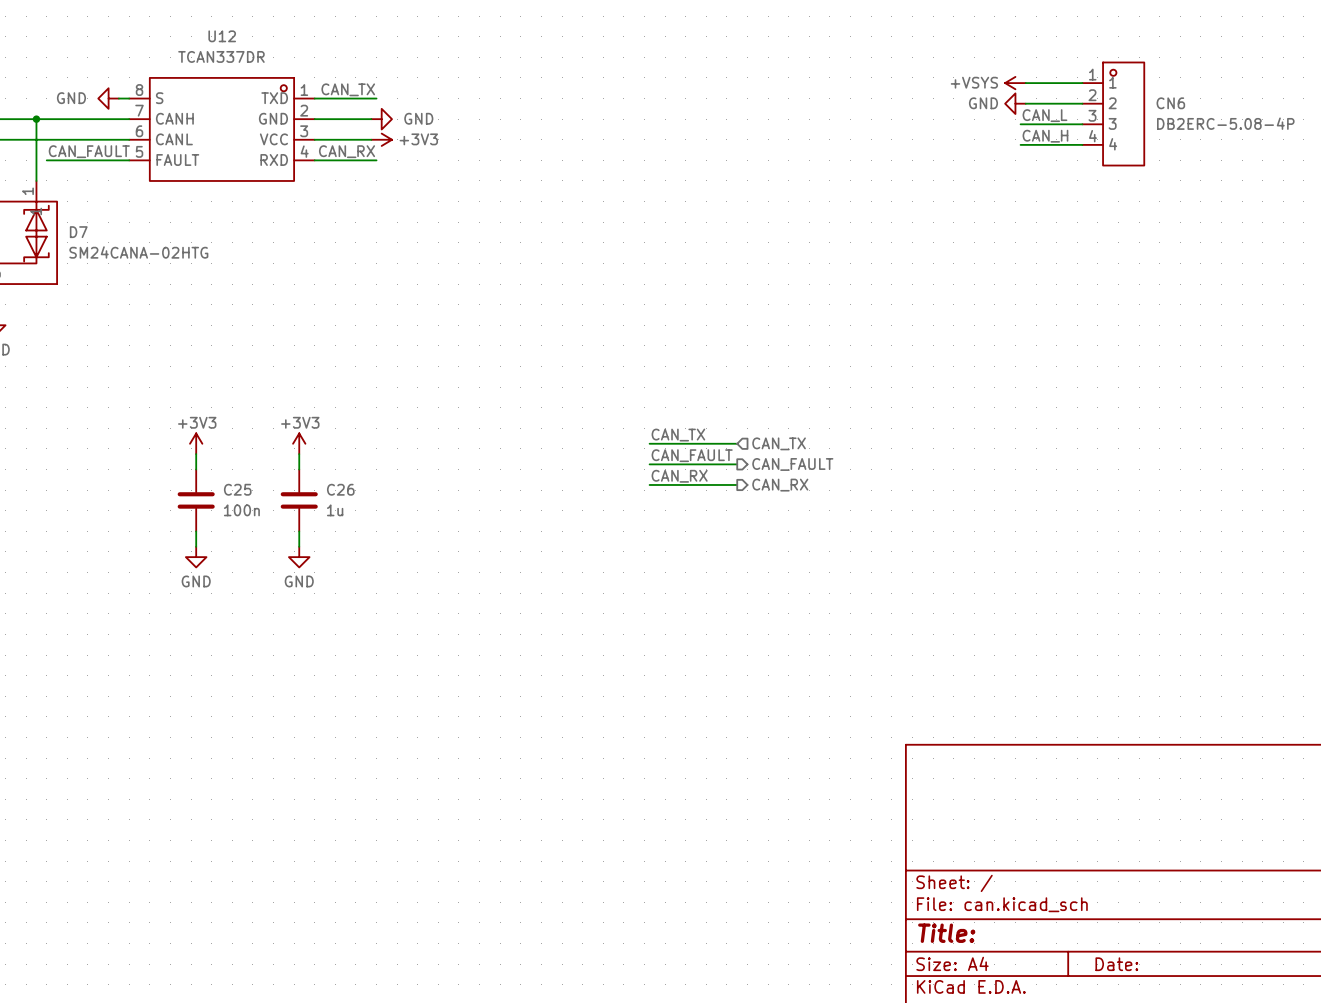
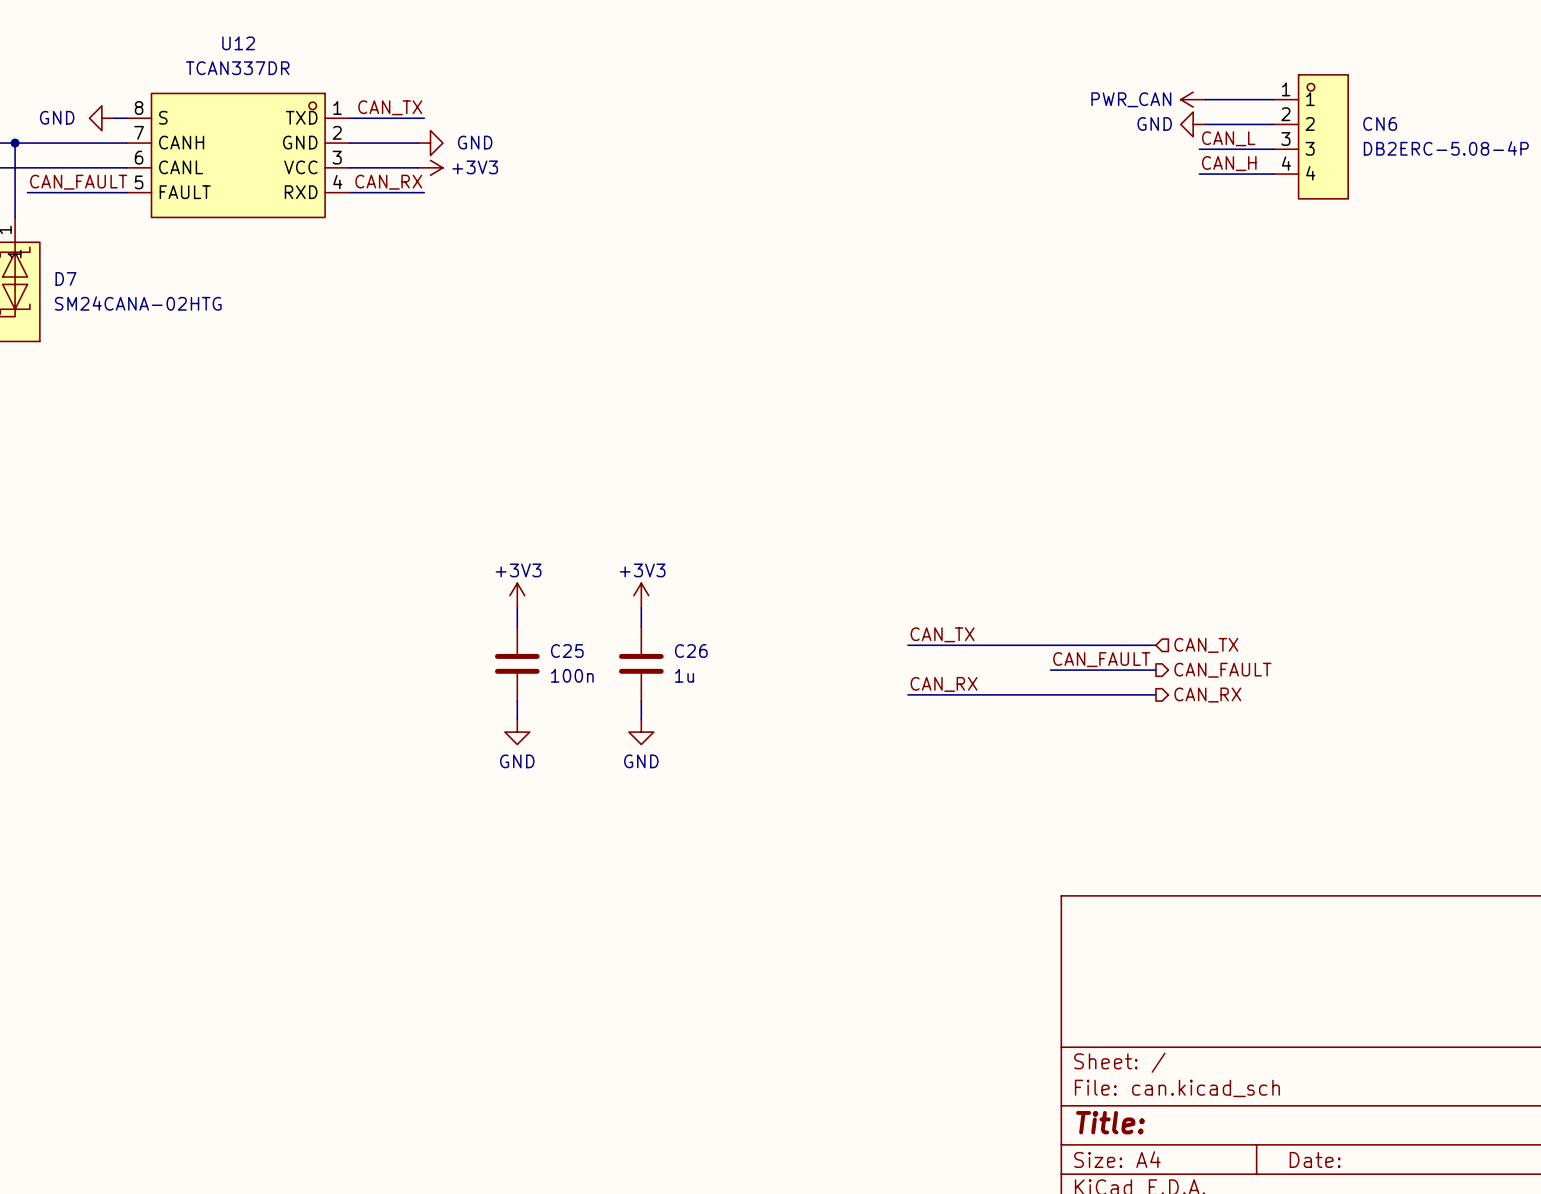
power symbol: +VSYS (1015, 83) -> PWR_CAN (1193, 99)
label position: CAN_TX (678, 435) -> CAN_TX (942, 634)
power symbol: +3V3 (196, 443) -> none
power symbol: +3V3 (299, 443) -> none
wire: (649, 443) (737, 443) -> none
hierarchical label: CAN_TX (779, 443) -> none
wire: (196, 454) (196, 469) -> none
wire: (299, 454) (299, 469) -> (517, 608) (517, 626)
label: CAN_FAULT (692, 455) -> none
wire: (649, 464) (737, 464) -> none
hierarchical label: CAN_FAULT (792, 464) -> none
label position: CAN_RX (679, 476) -> CAN_RX (944, 684)
wire: (649, 484) (737, 484) -> none
hierarchical label: CAN_RX (780, 485) -> none
power symbol: none -> +3V3 (517, 595)
power symbol: none -> +3V3 (641, 595)
C25 position: (196, 500) -> (517, 663)
C26 position: (299, 500) -> (641, 663)
wire: none -> (641, 608) (641, 626)
wire: (196, 531) (196, 546) -> none
wire: (299, 531) (299, 546) -> (517, 701) (517, 719)
wire: none -> (907, 645) (1155, 645)
hierarchical label: none -> CAN_TX (1206, 645)
label: none -> CAN_FAULT (1101, 659)
power symbol: GND (196, 557) -> none
power symbol: GND (299, 557) -> none
wire: none -> (1050, 670) (1155, 670)
hierarchical label: none -> CAN_FAULT (1222, 670)
wire: none -> (907, 694) (1155, 694)
hierarchical label: none -> CAN_RX (1207, 695)
wire: none -> (641, 701) (641, 719)
power symbol: none -> GND (517, 732)
power symbol: none -> GND (641, 732)

